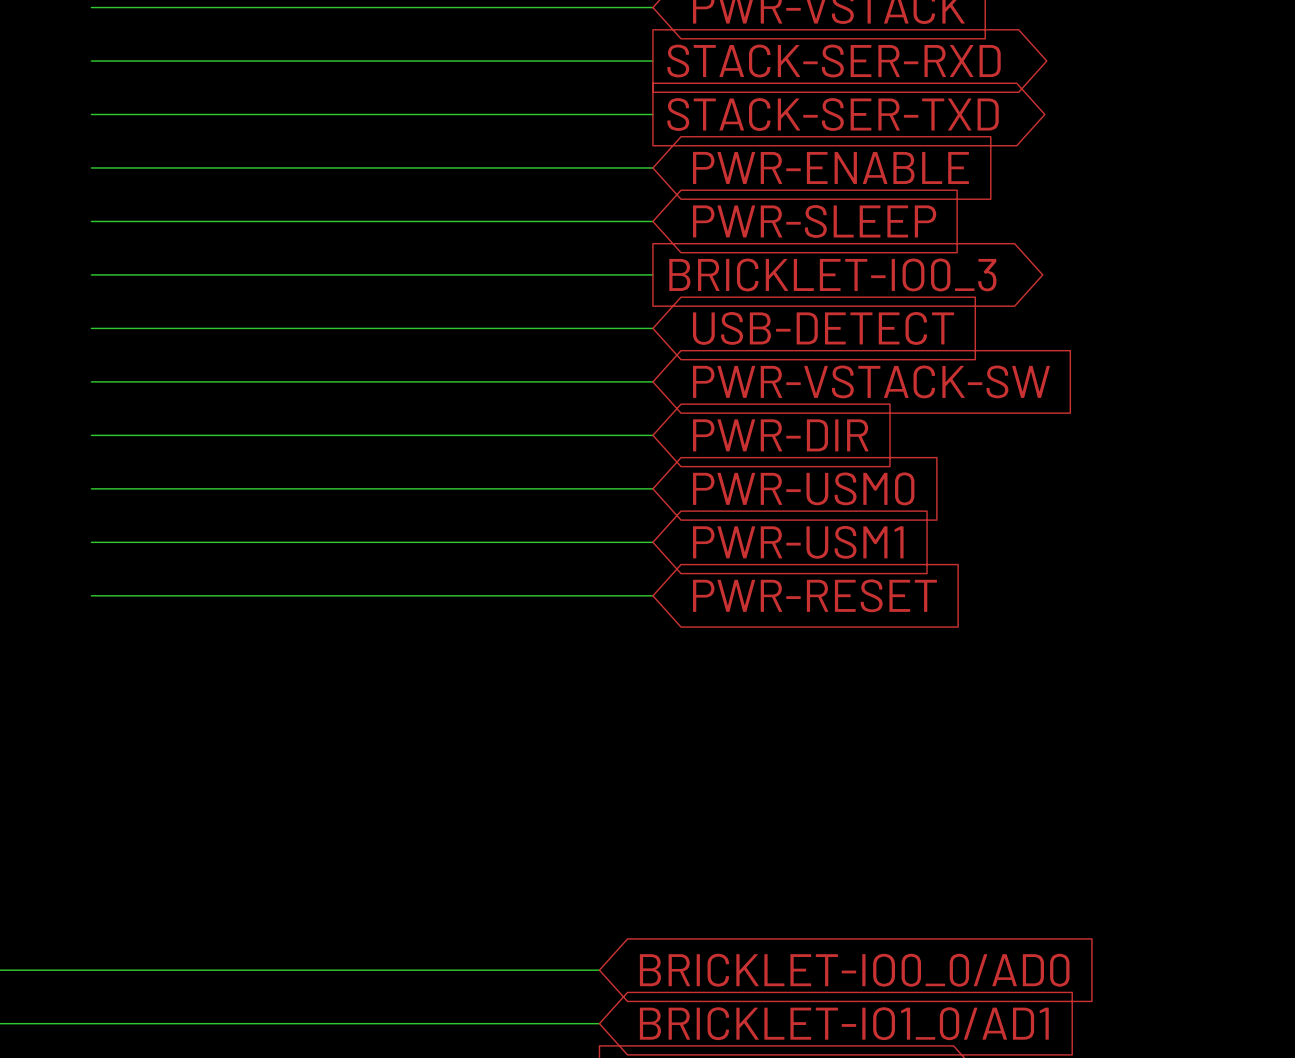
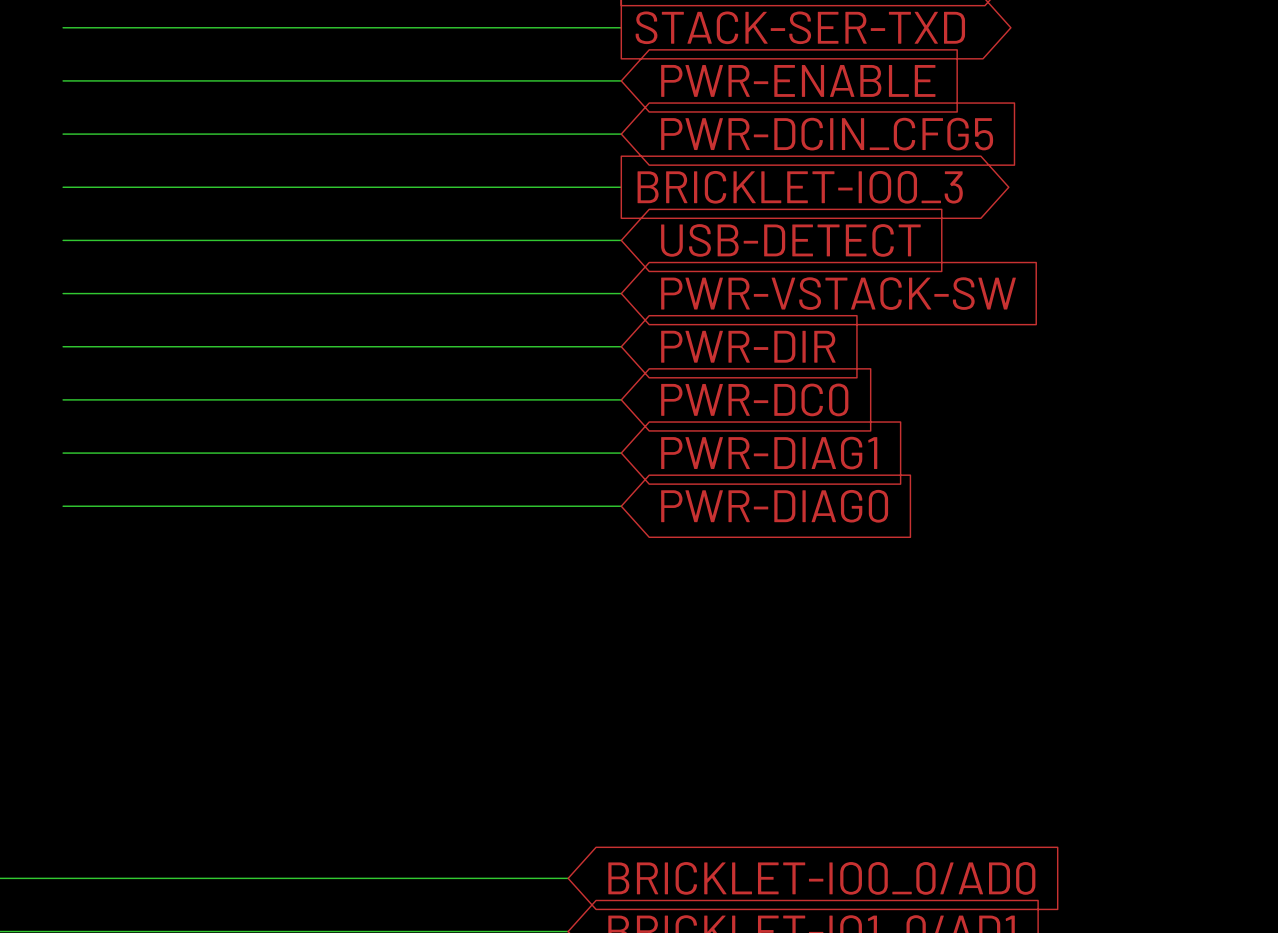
global label: PWR-SLEEP (814, 221) -> PWR-DCIN_CFG5 (827, 134)
global label: PWR-USM0 (803, 488) -> PWR-DC0 (754, 399)
global label: PWR-USM1 (798, 542) -> PWR-DIAG1 (769, 453)
global label: PWR-RESET (814, 595) -> PWR-DIAG0 (774, 506)

